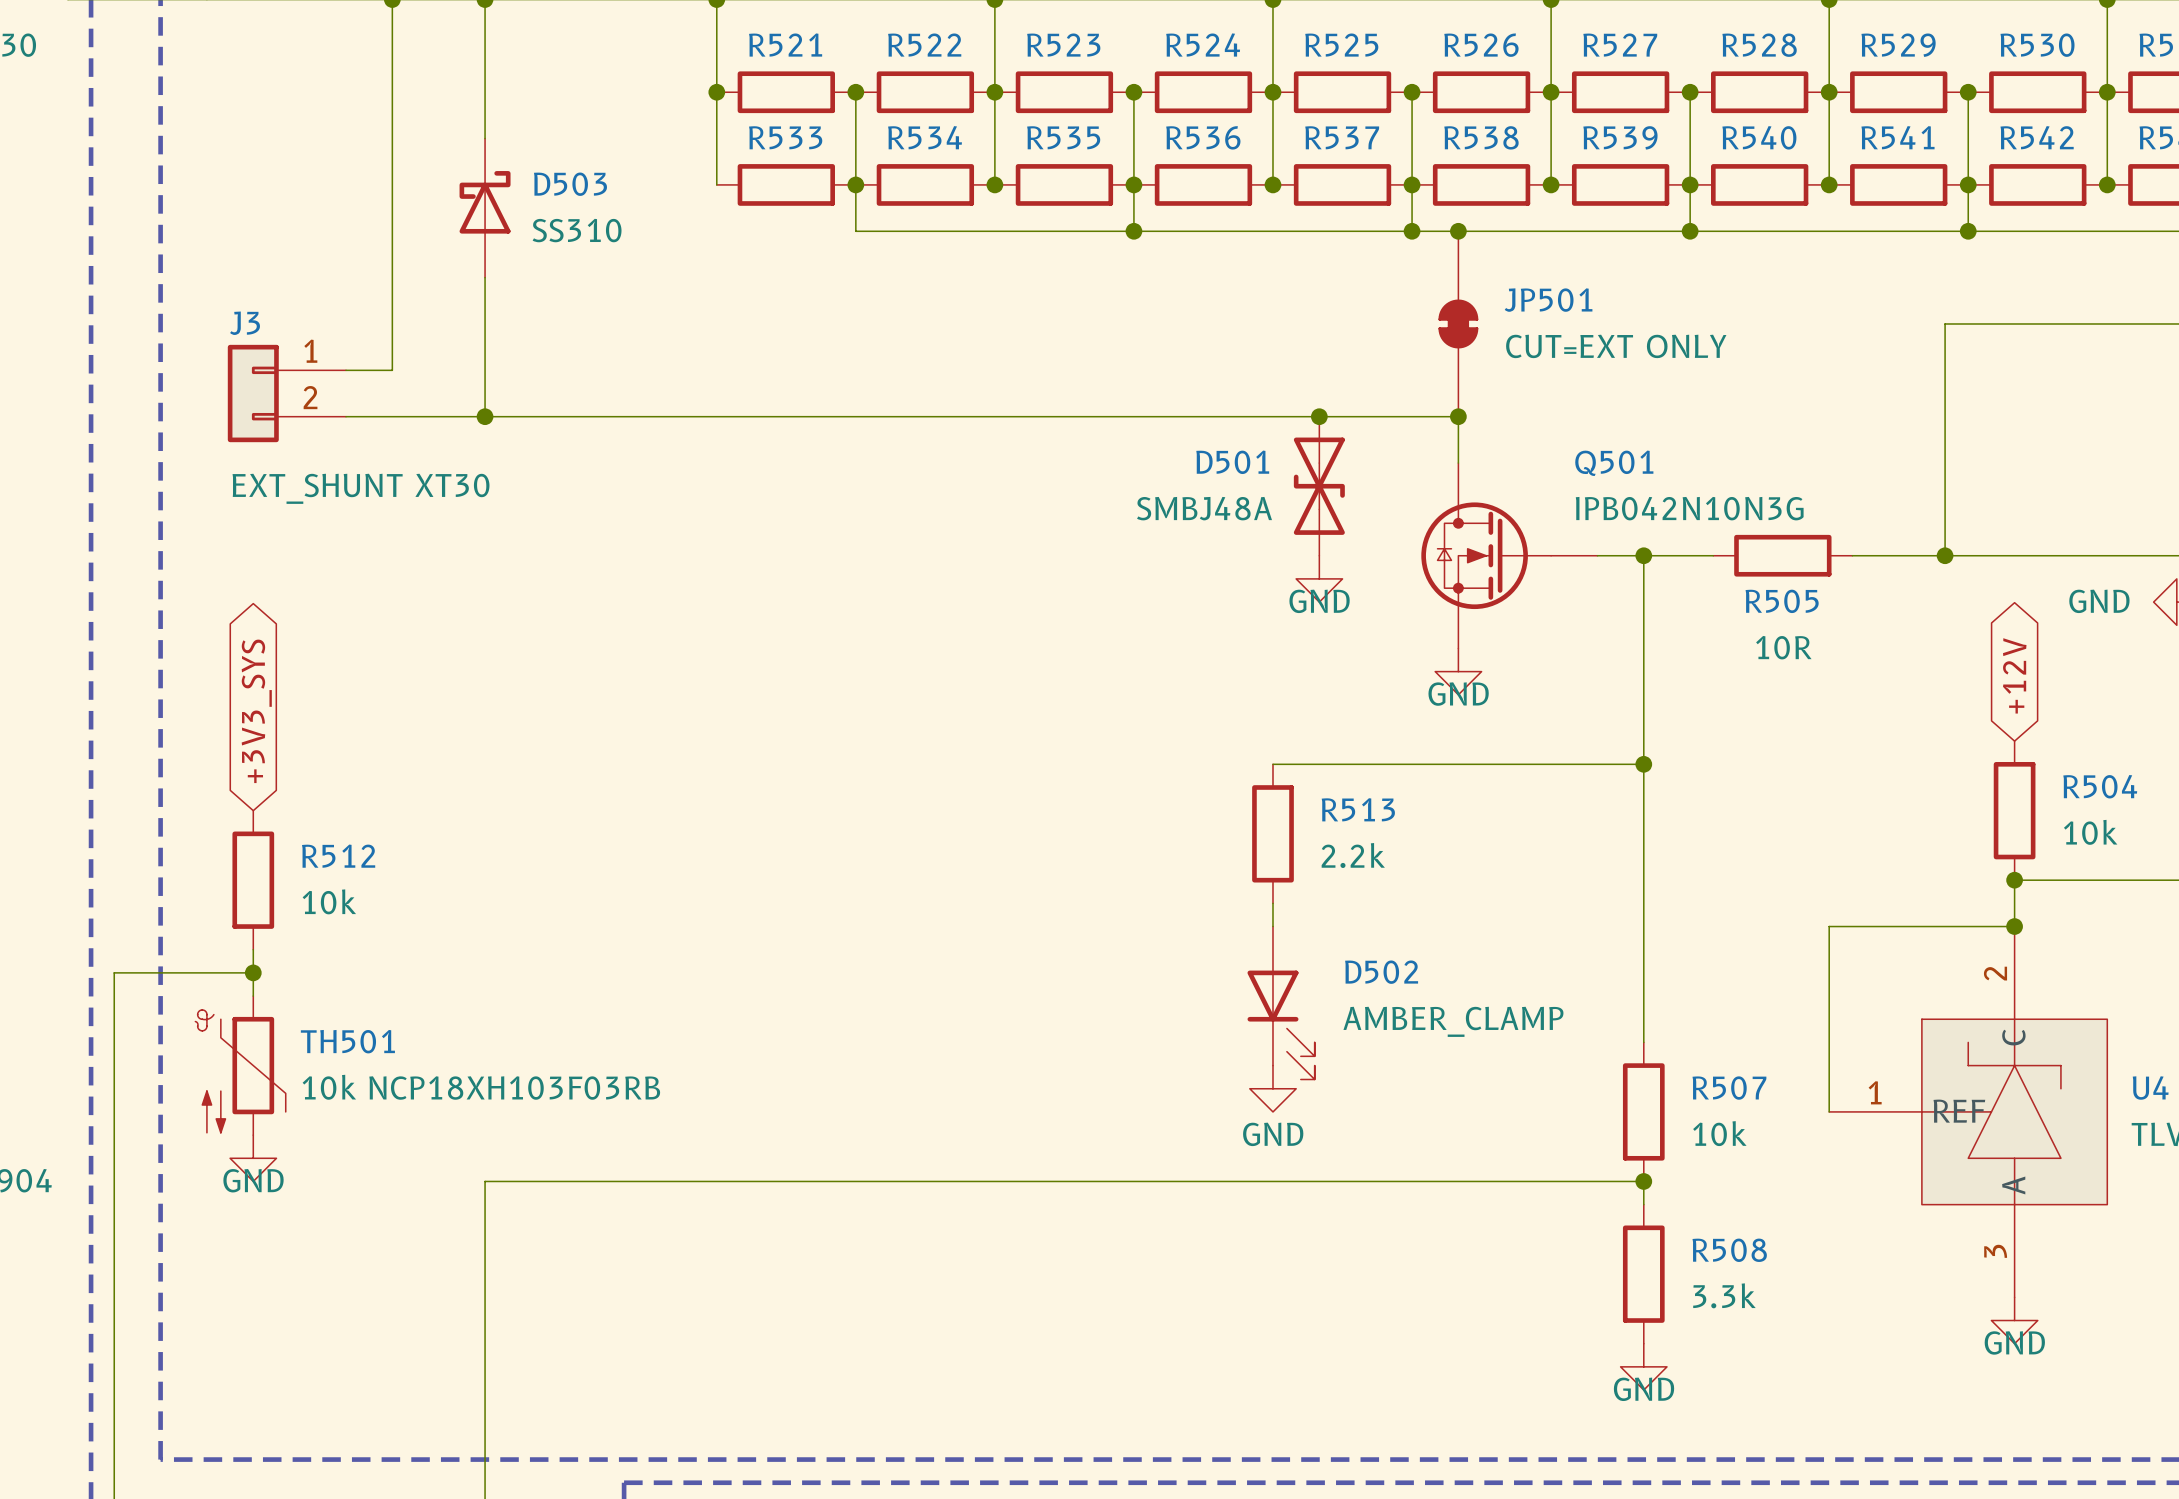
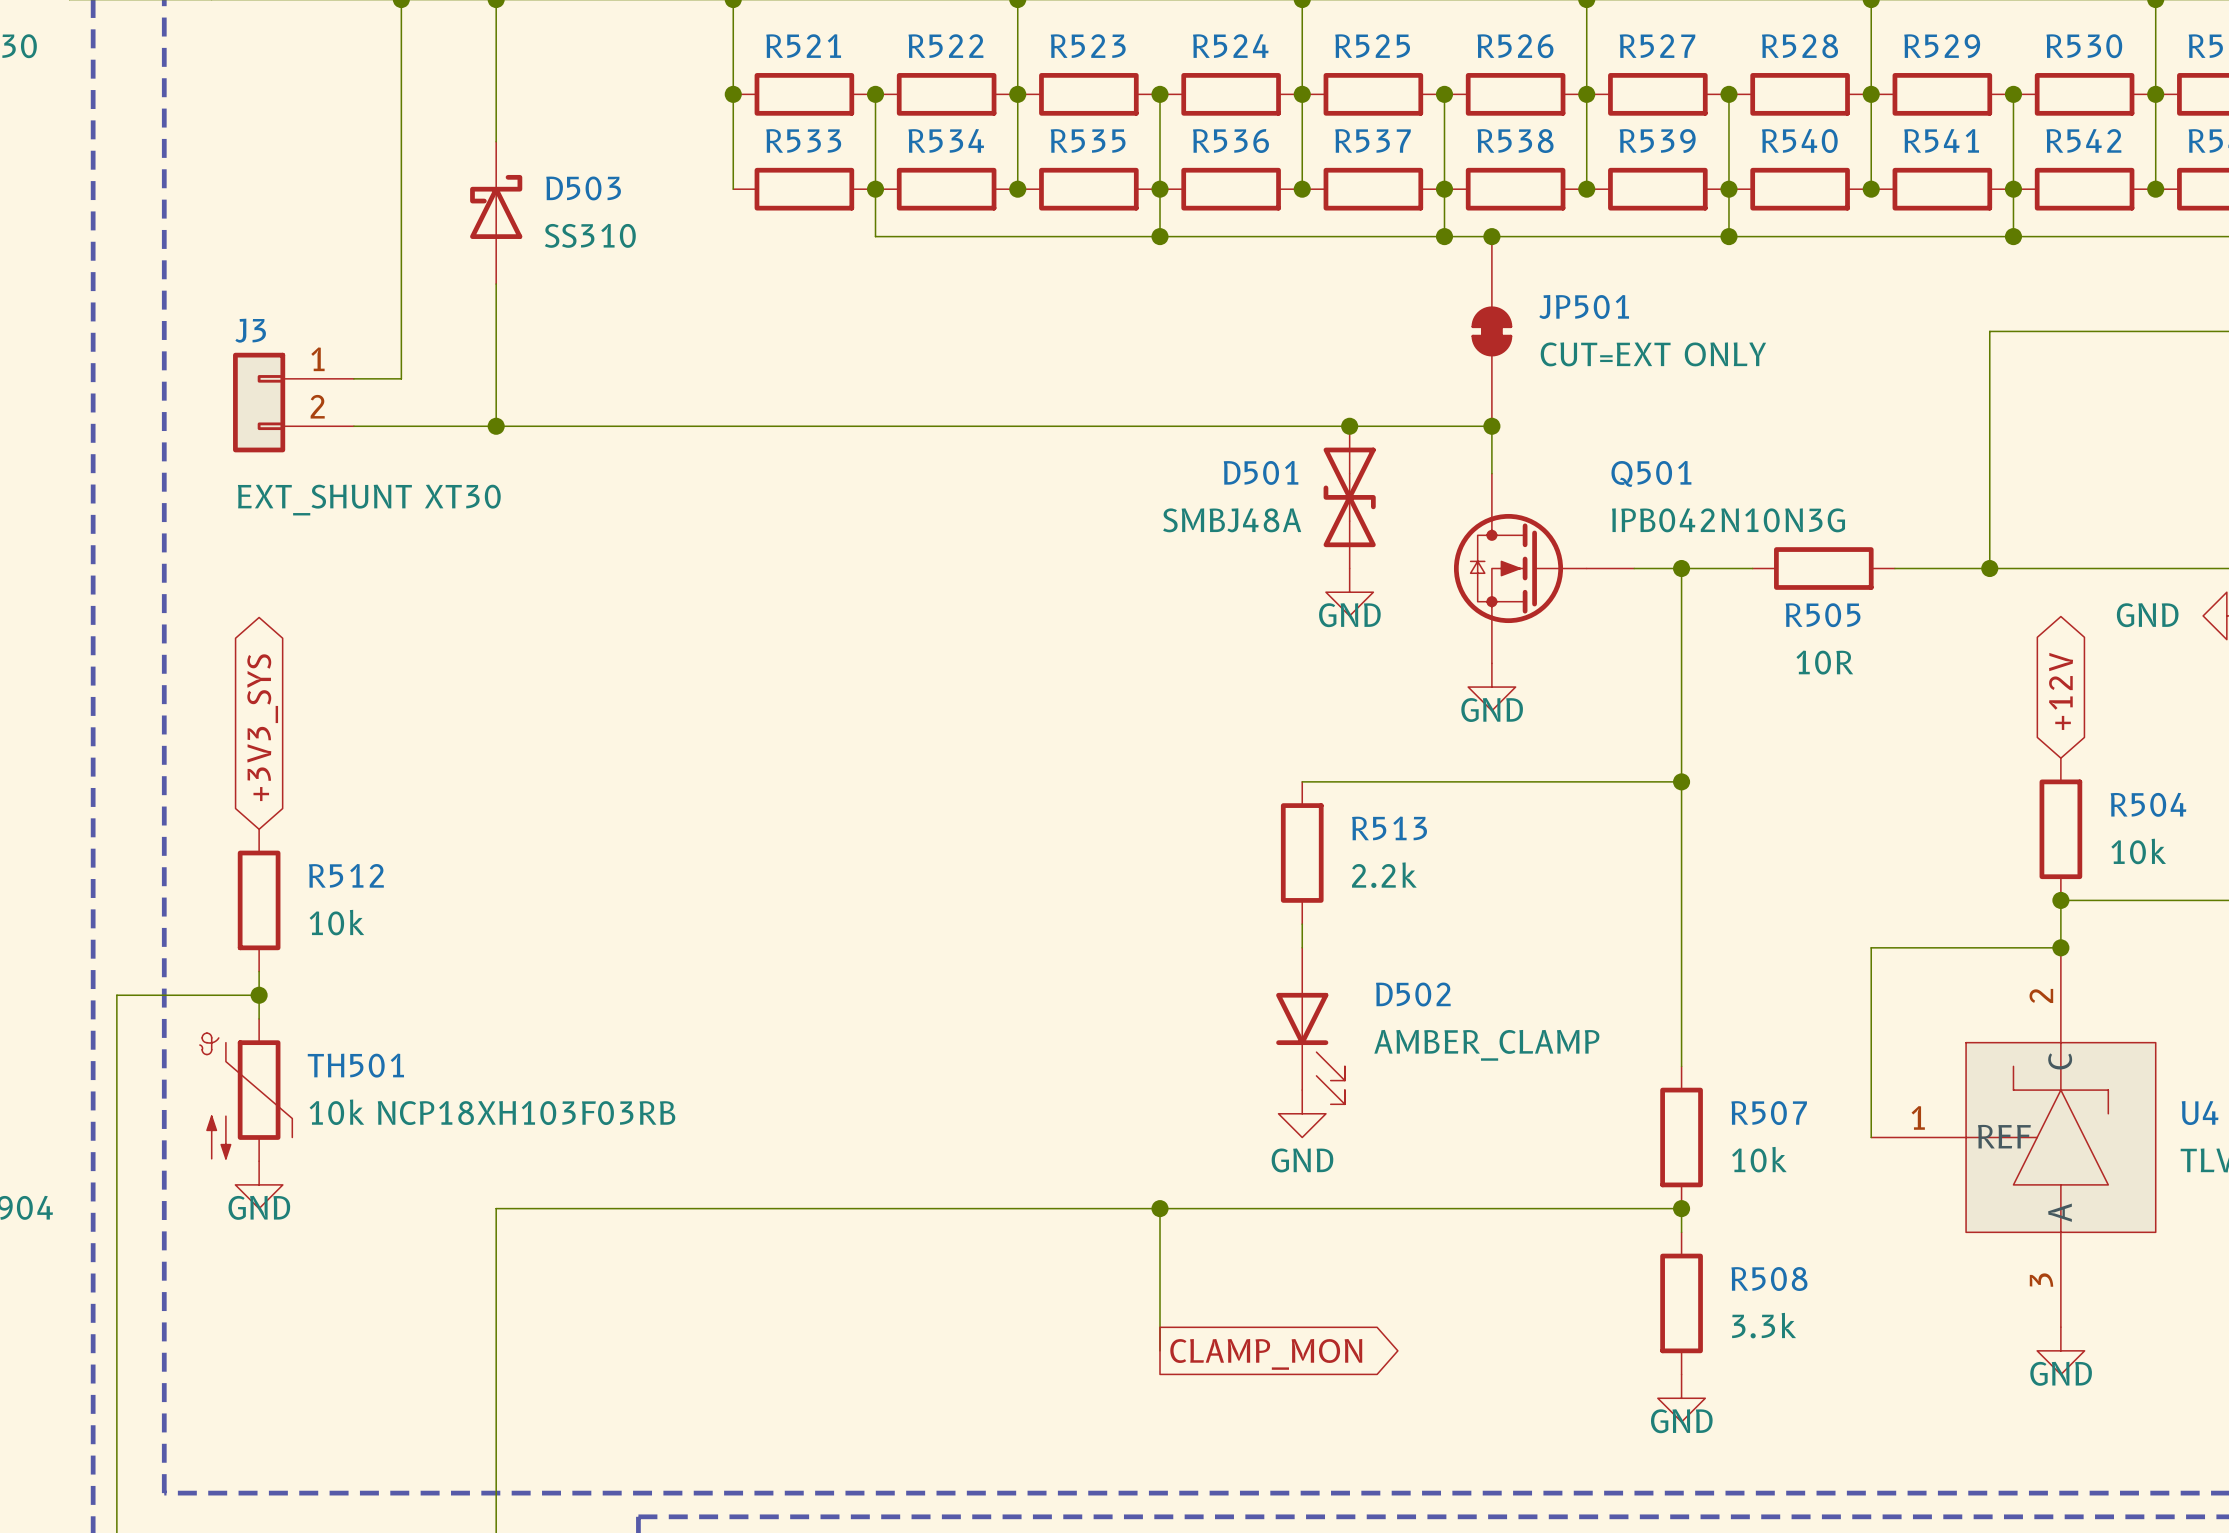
wire: none -> (1160, 1208) (1160, 1350)
junction: none -> (1160, 1208)
global label: none -> CLAMP_MON (1266, 1354)

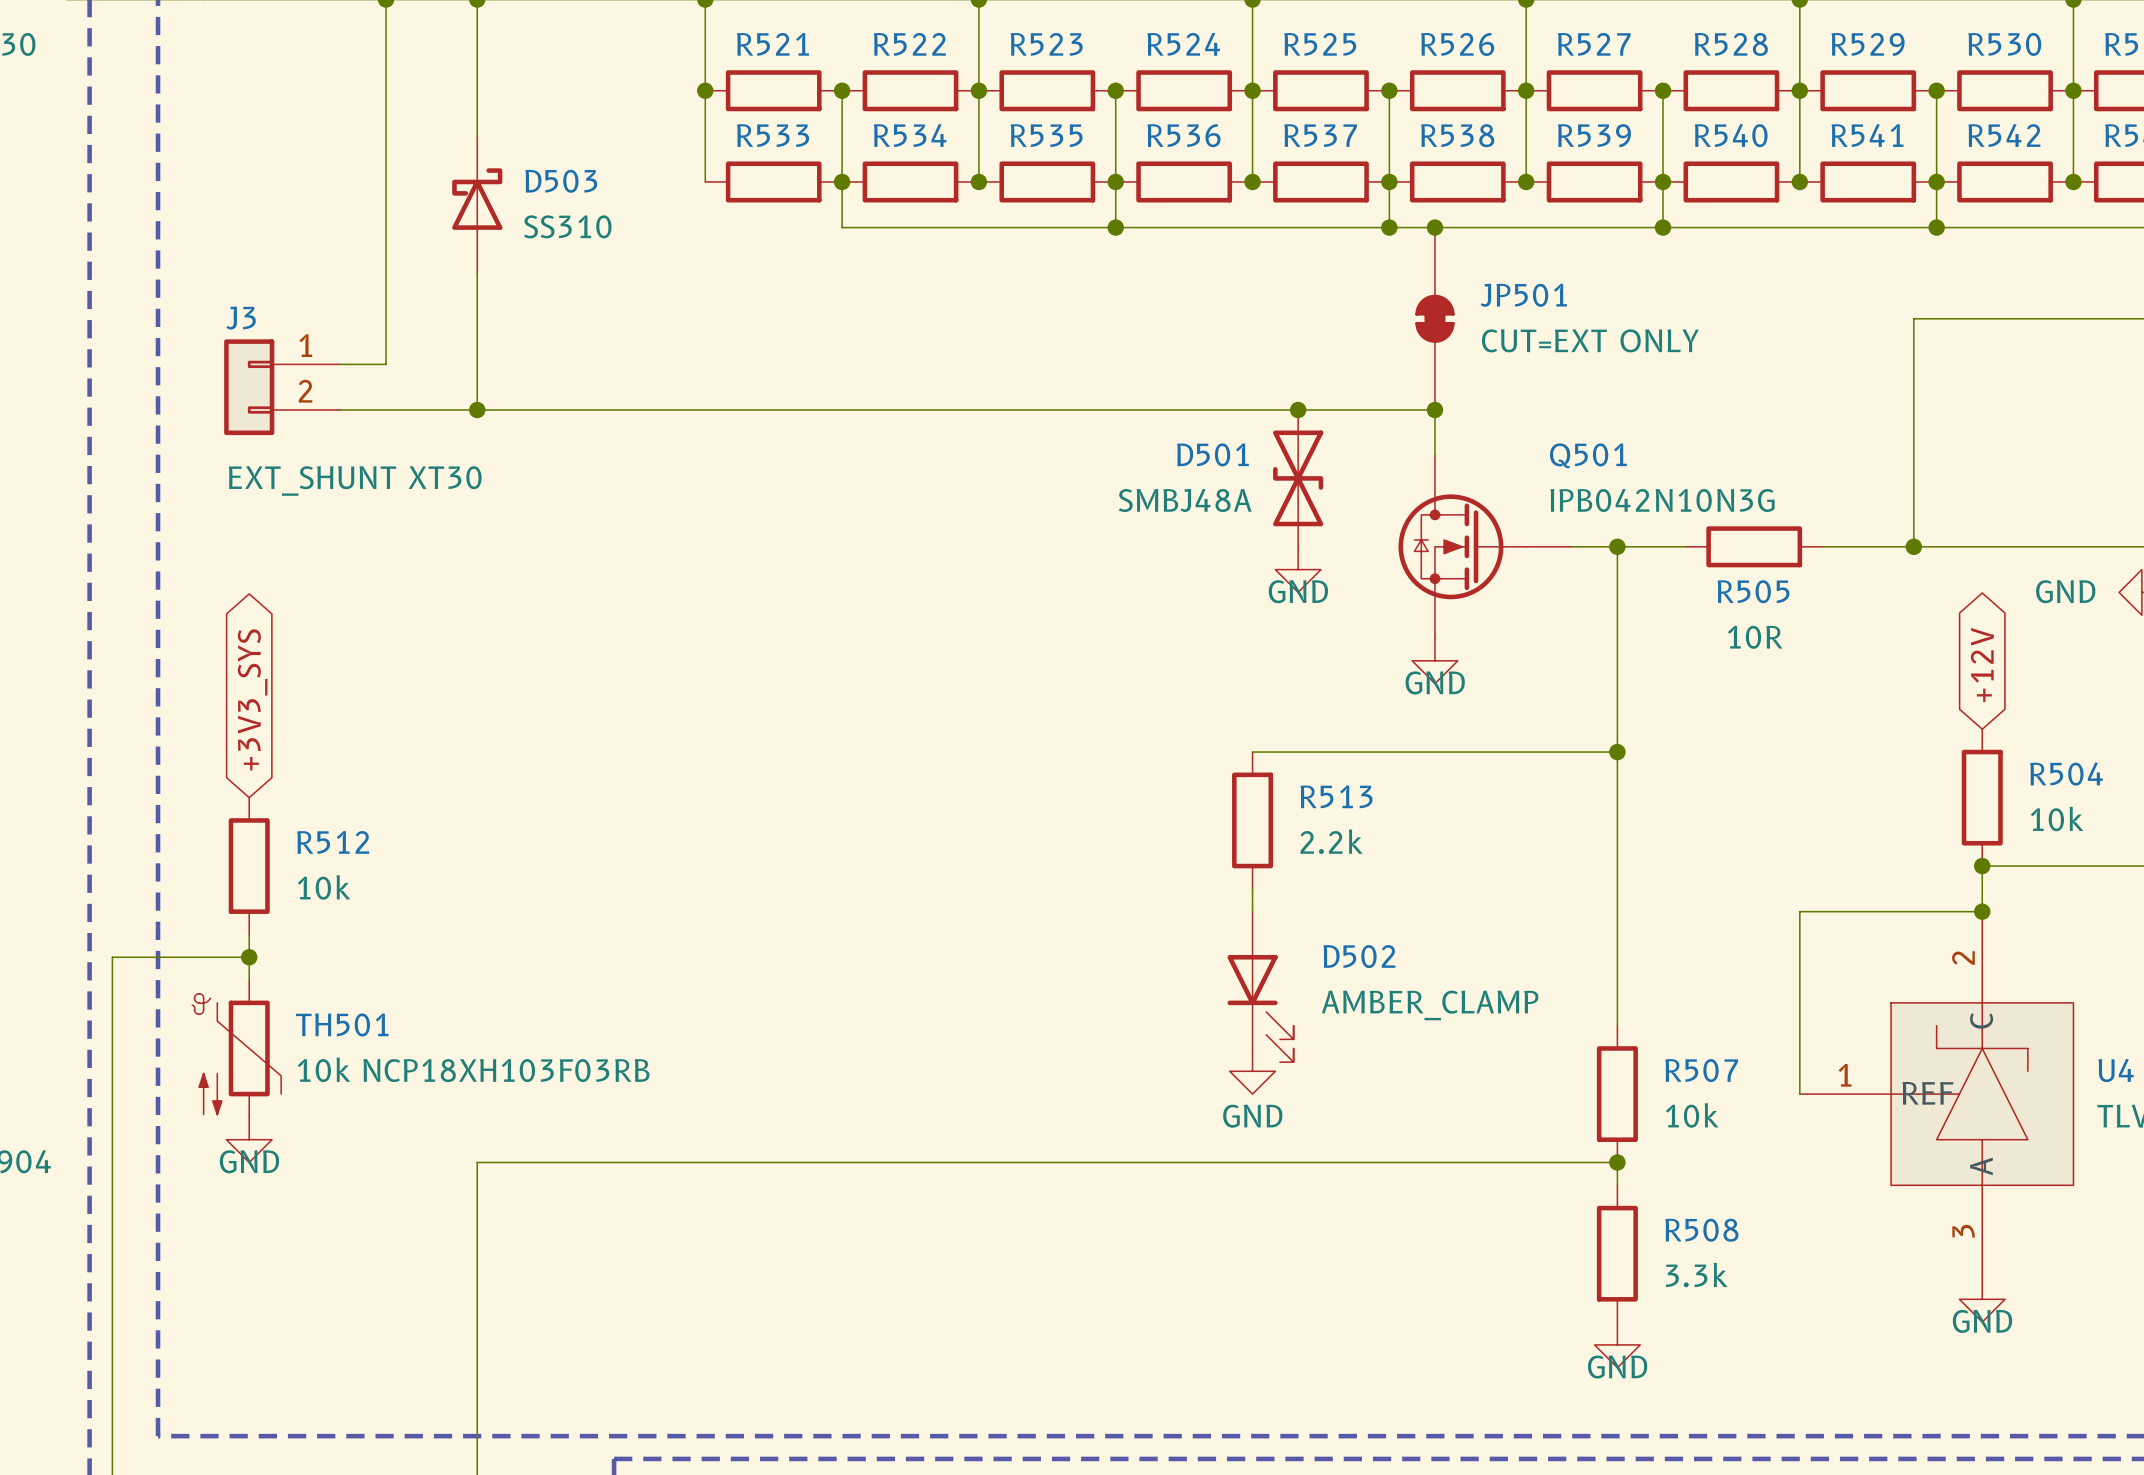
wire: (1160, 1208) (1160, 1350) -> none
junction: (1160, 1208) -> none
global label: CLAMP_MON (1266, 1354) -> none

